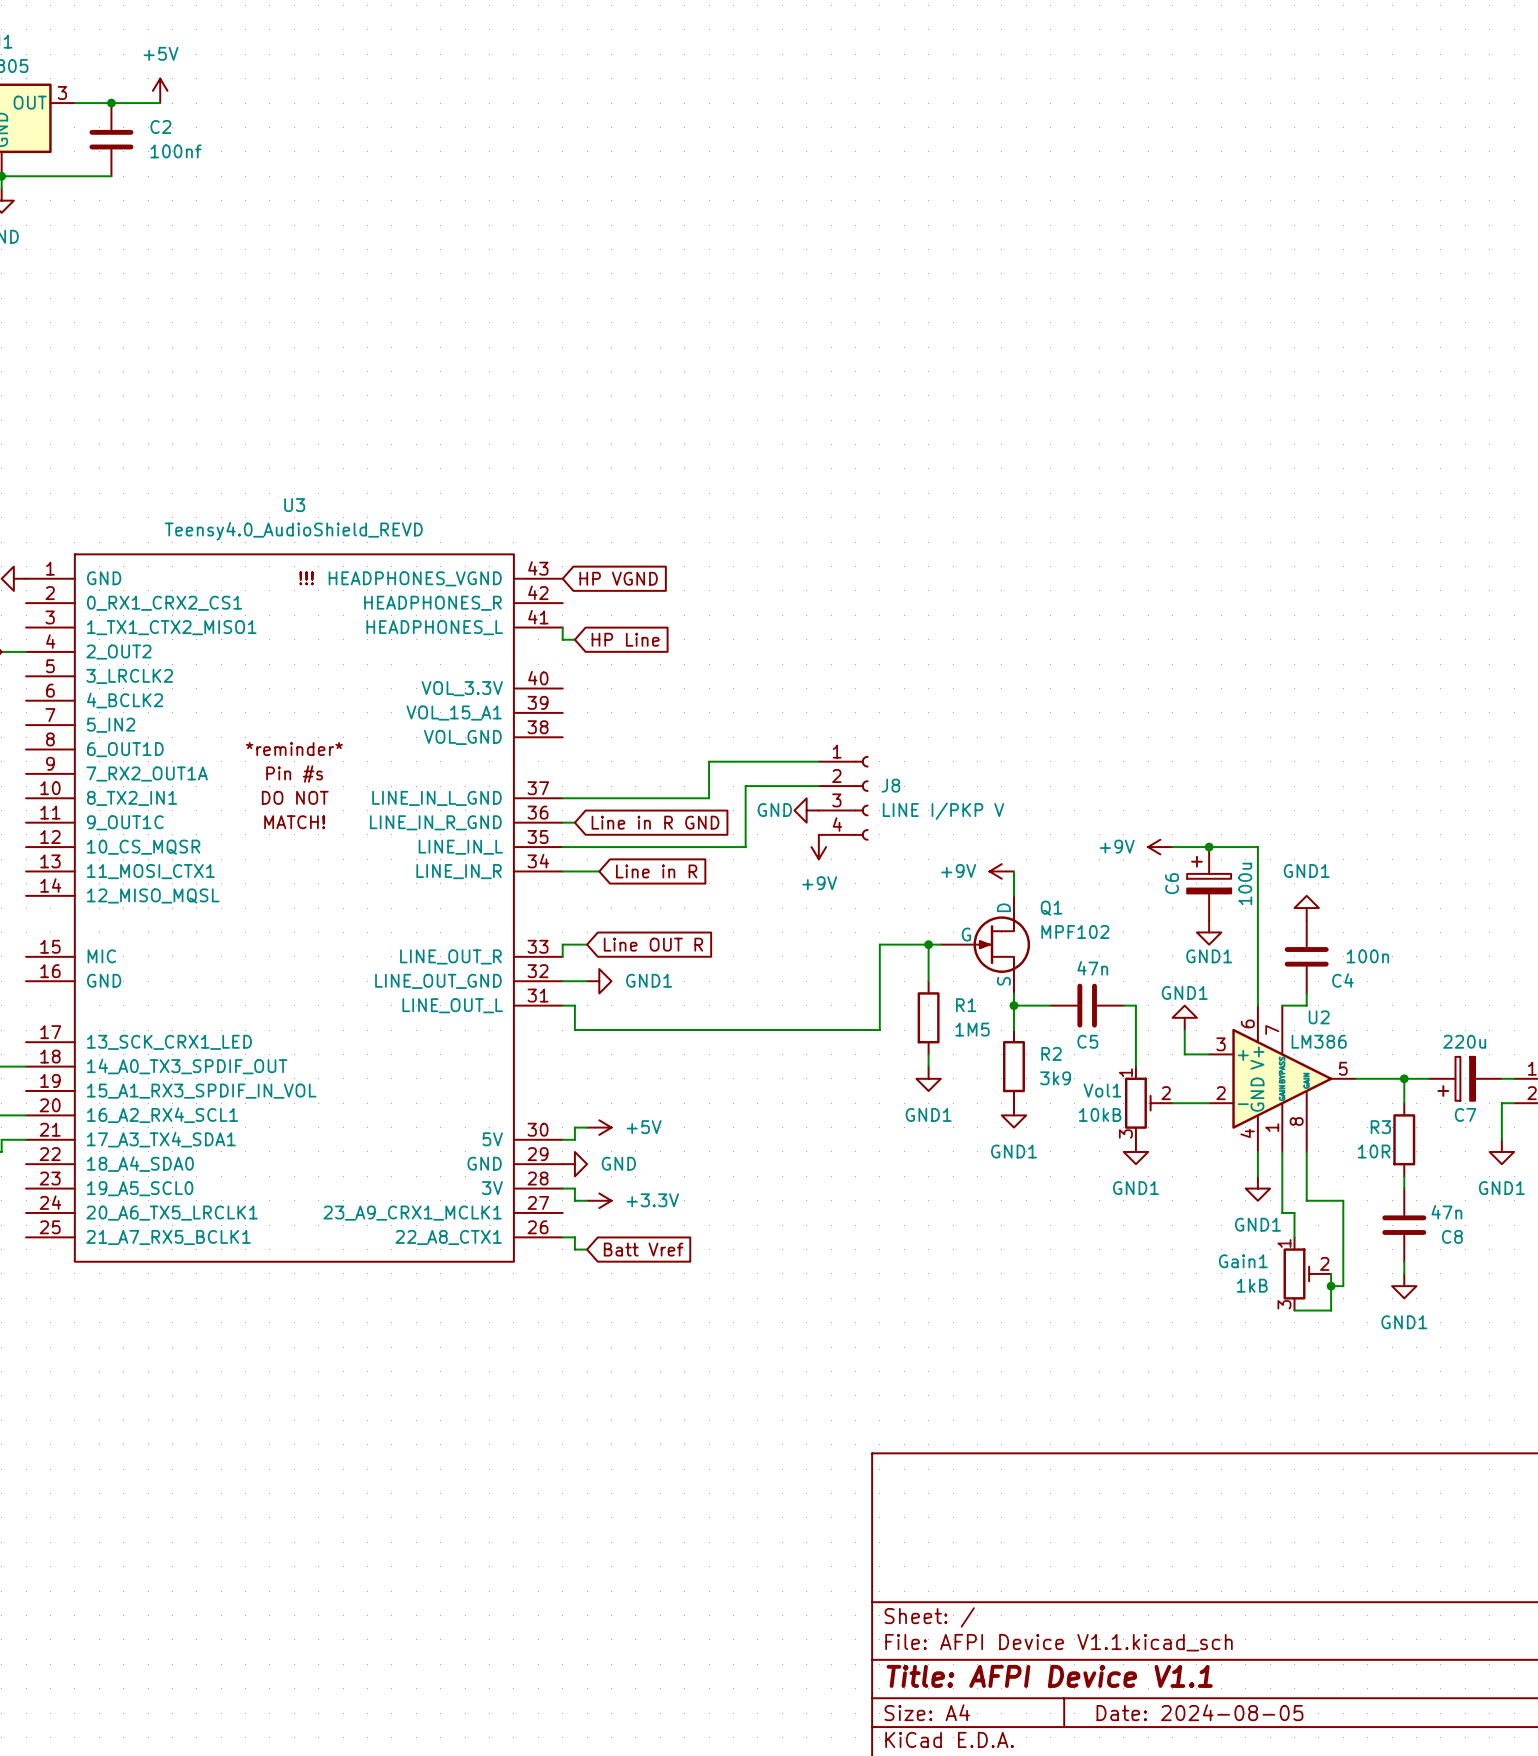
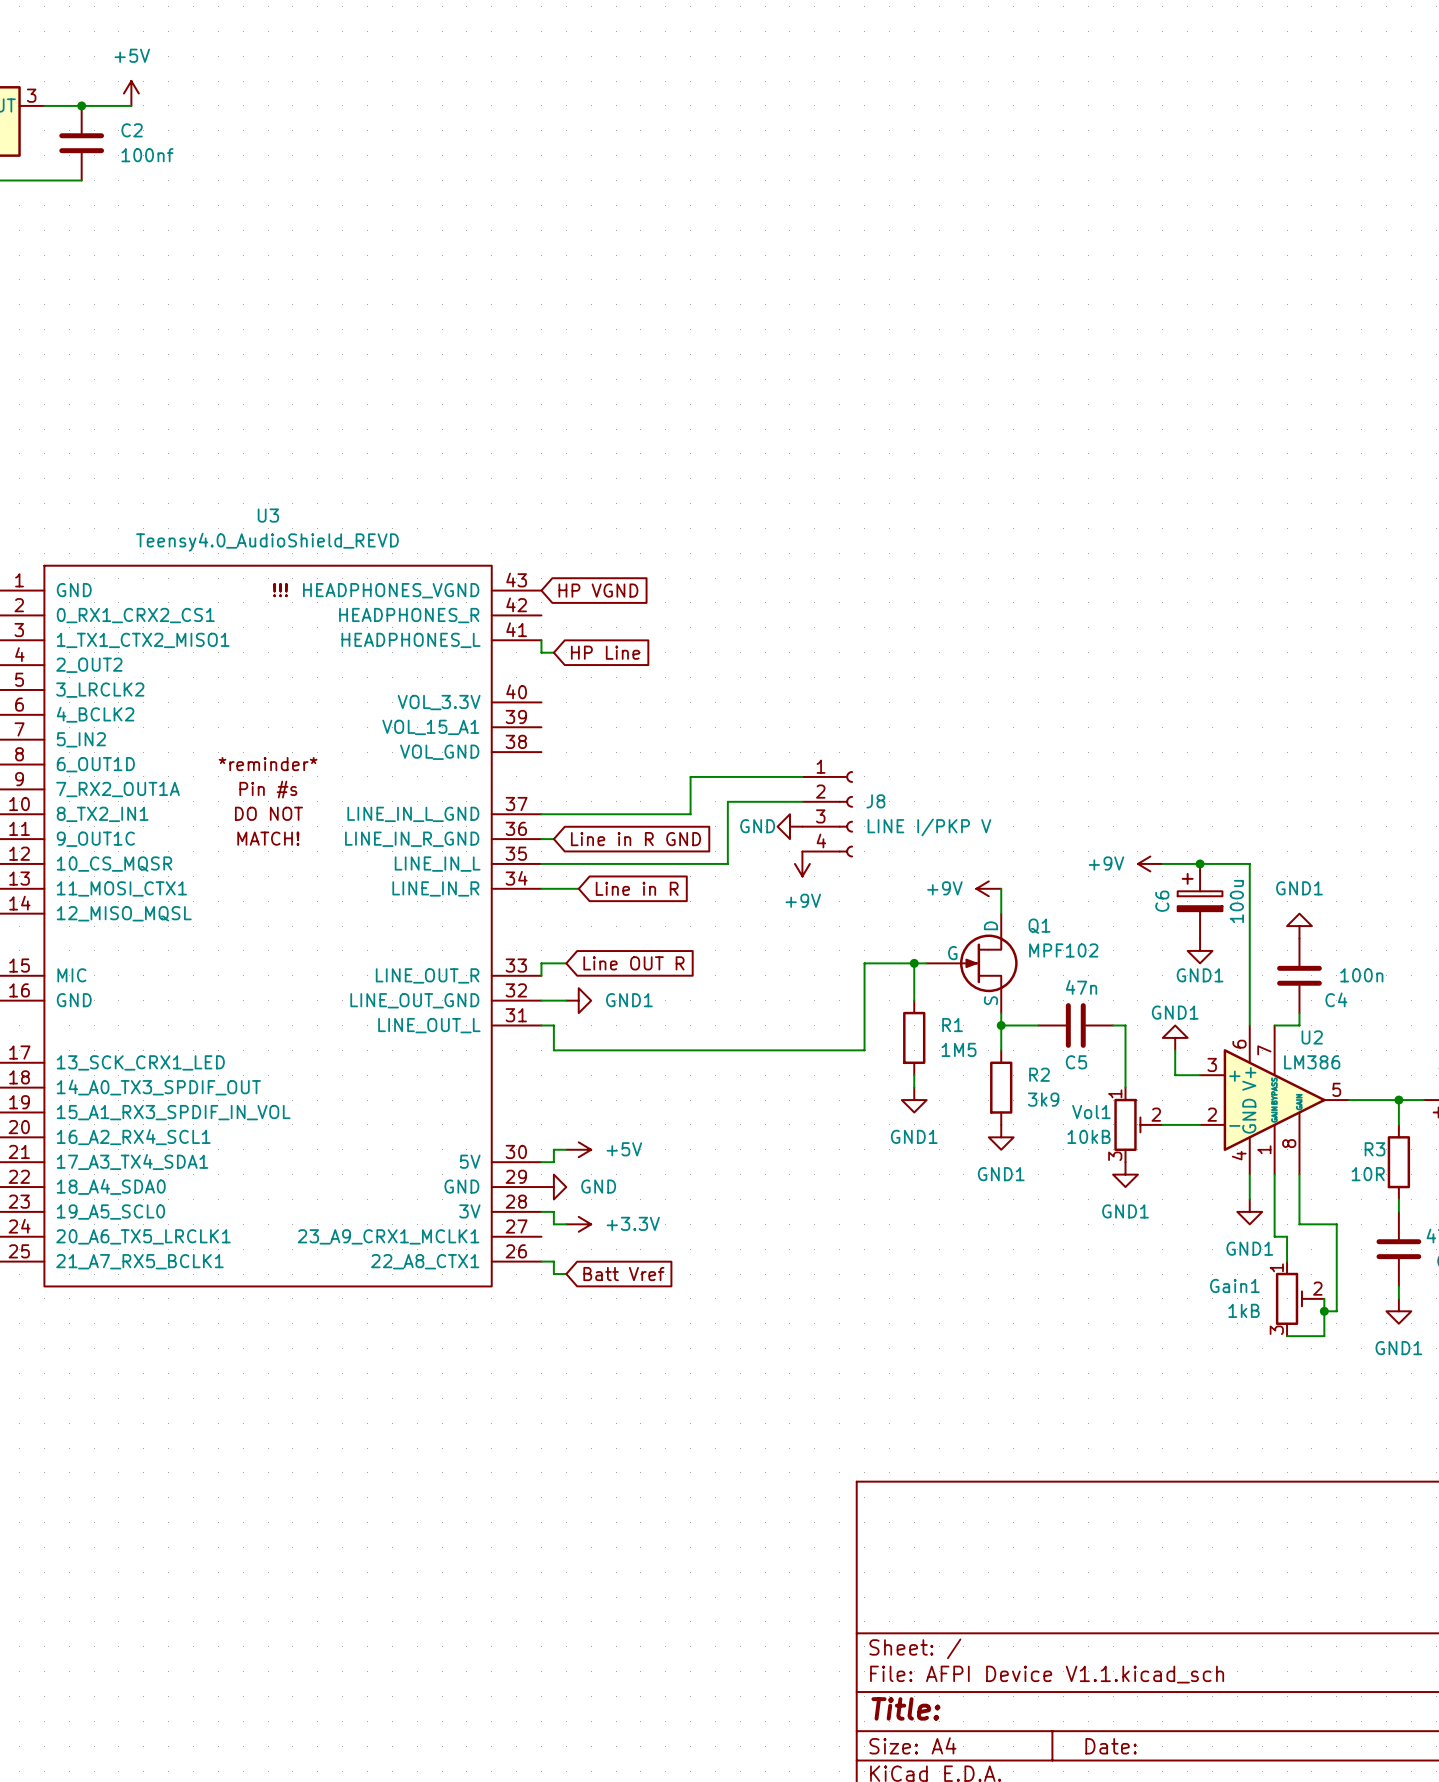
title block: Title: AFPI Device V1.1 (1049, 1676) -> Title: (905, 1708)
title block: Date: 2024-08-05 (1199, 1712) -> Date: (1111, 1746)

